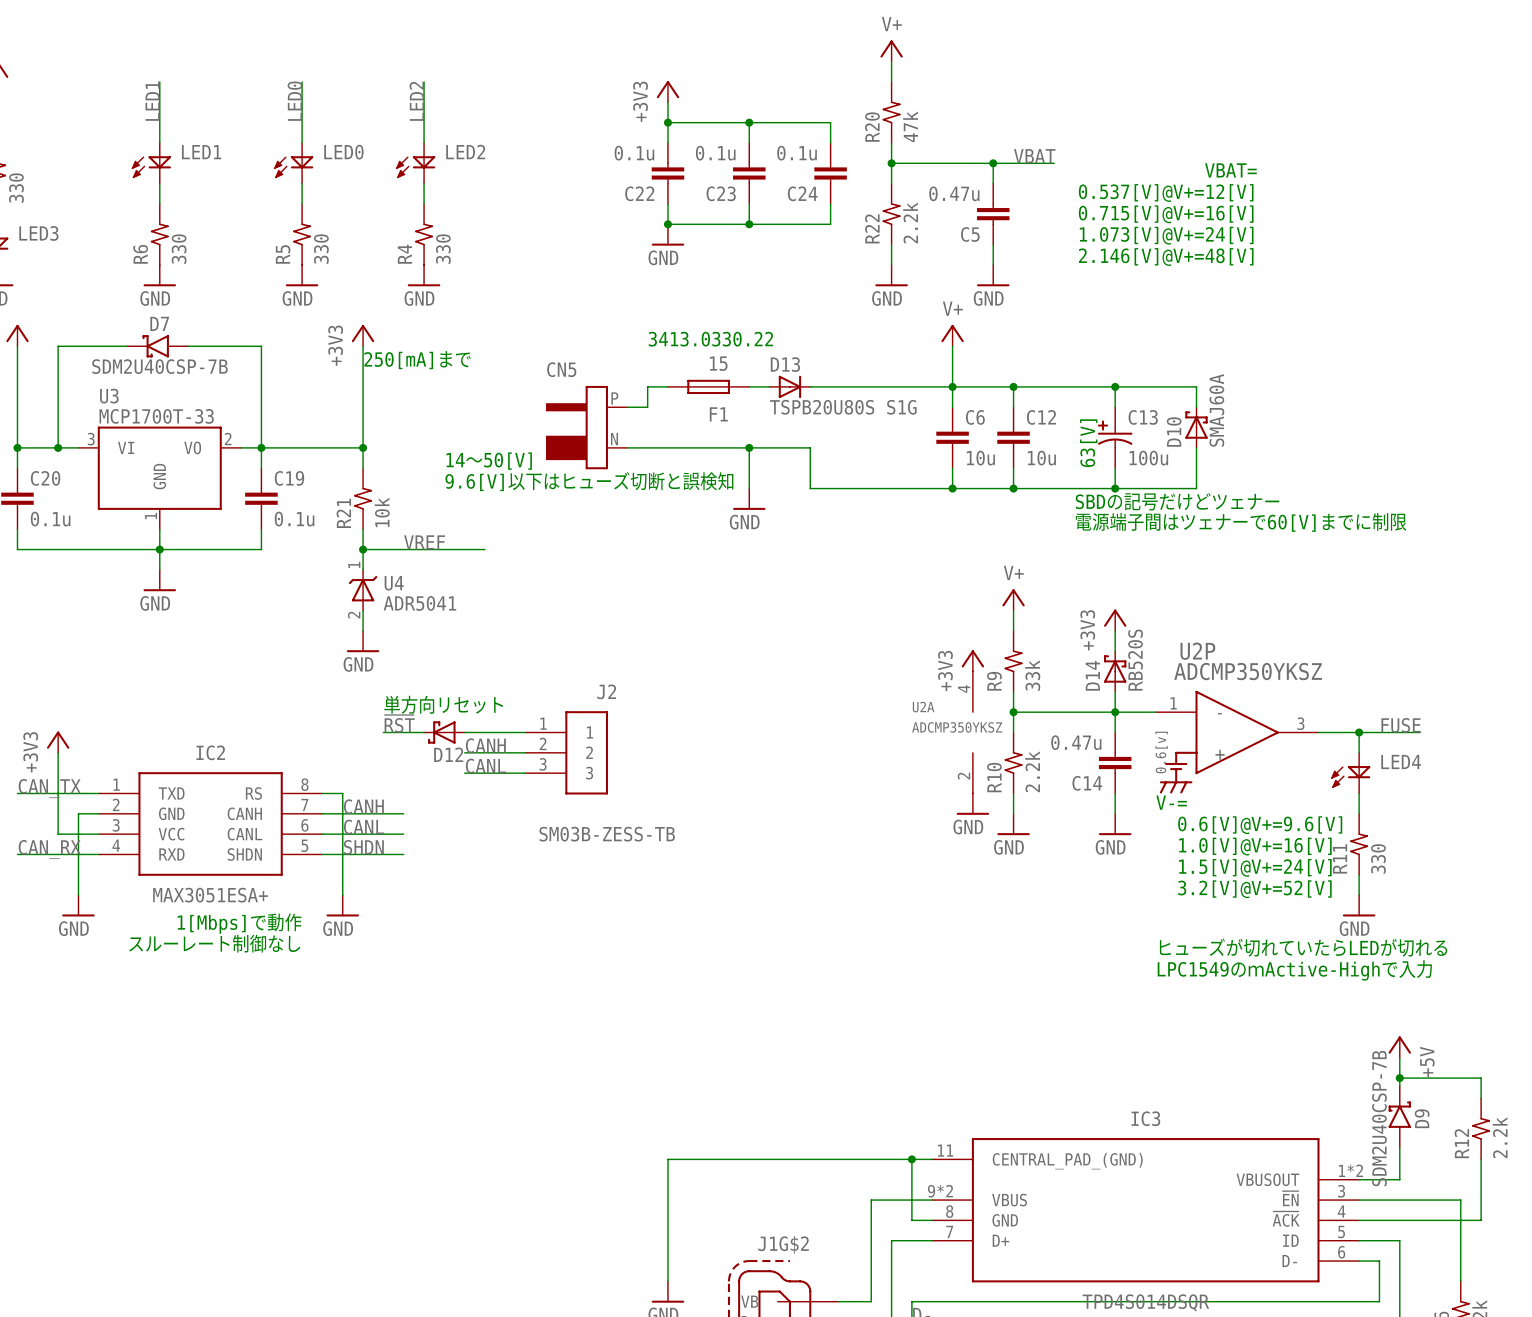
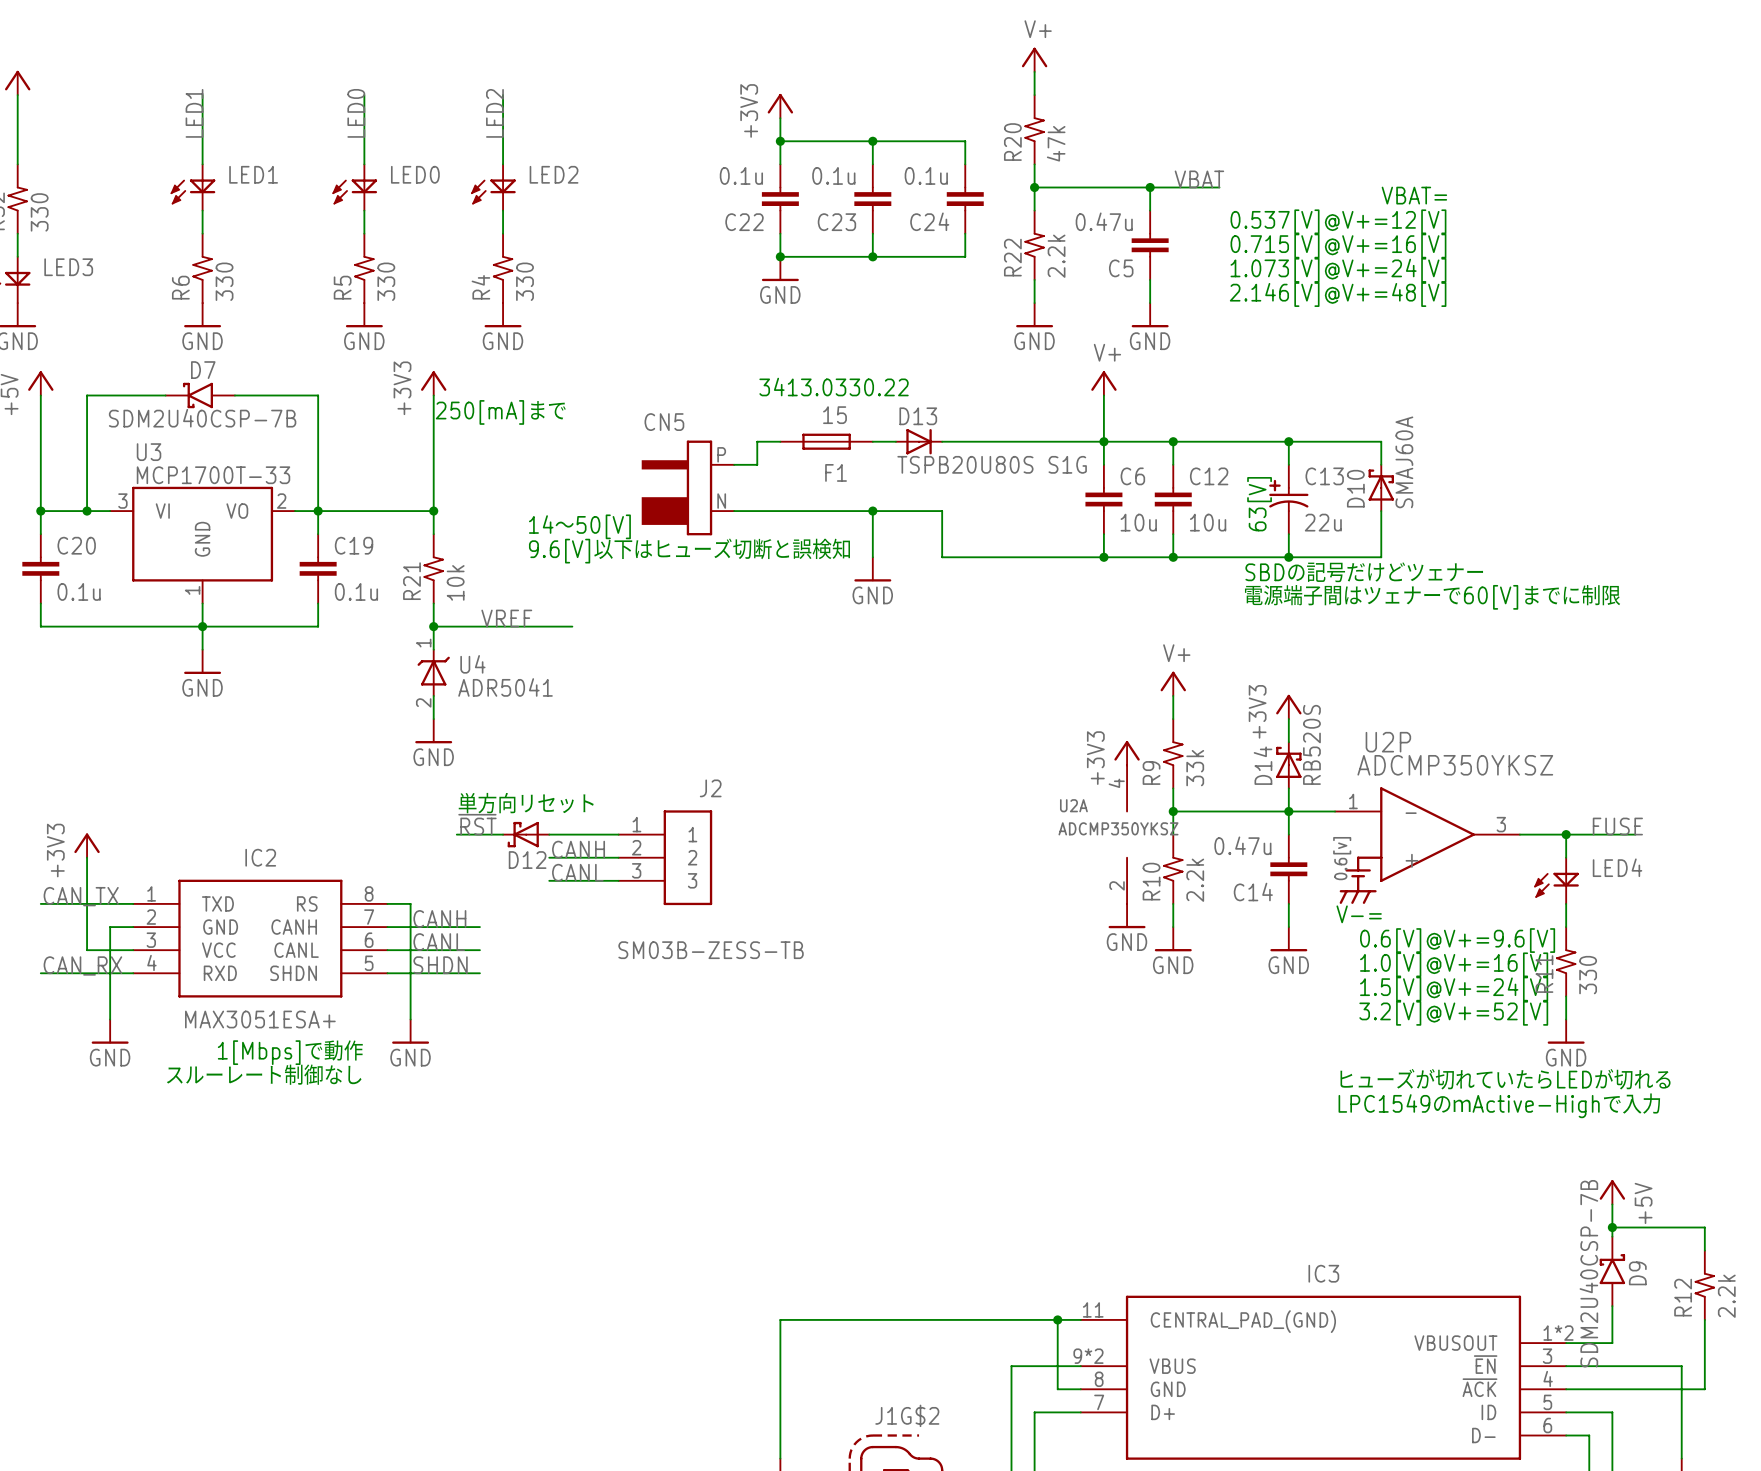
C13 value: 100u (1148, 458) -> 22u (1323, 522)

